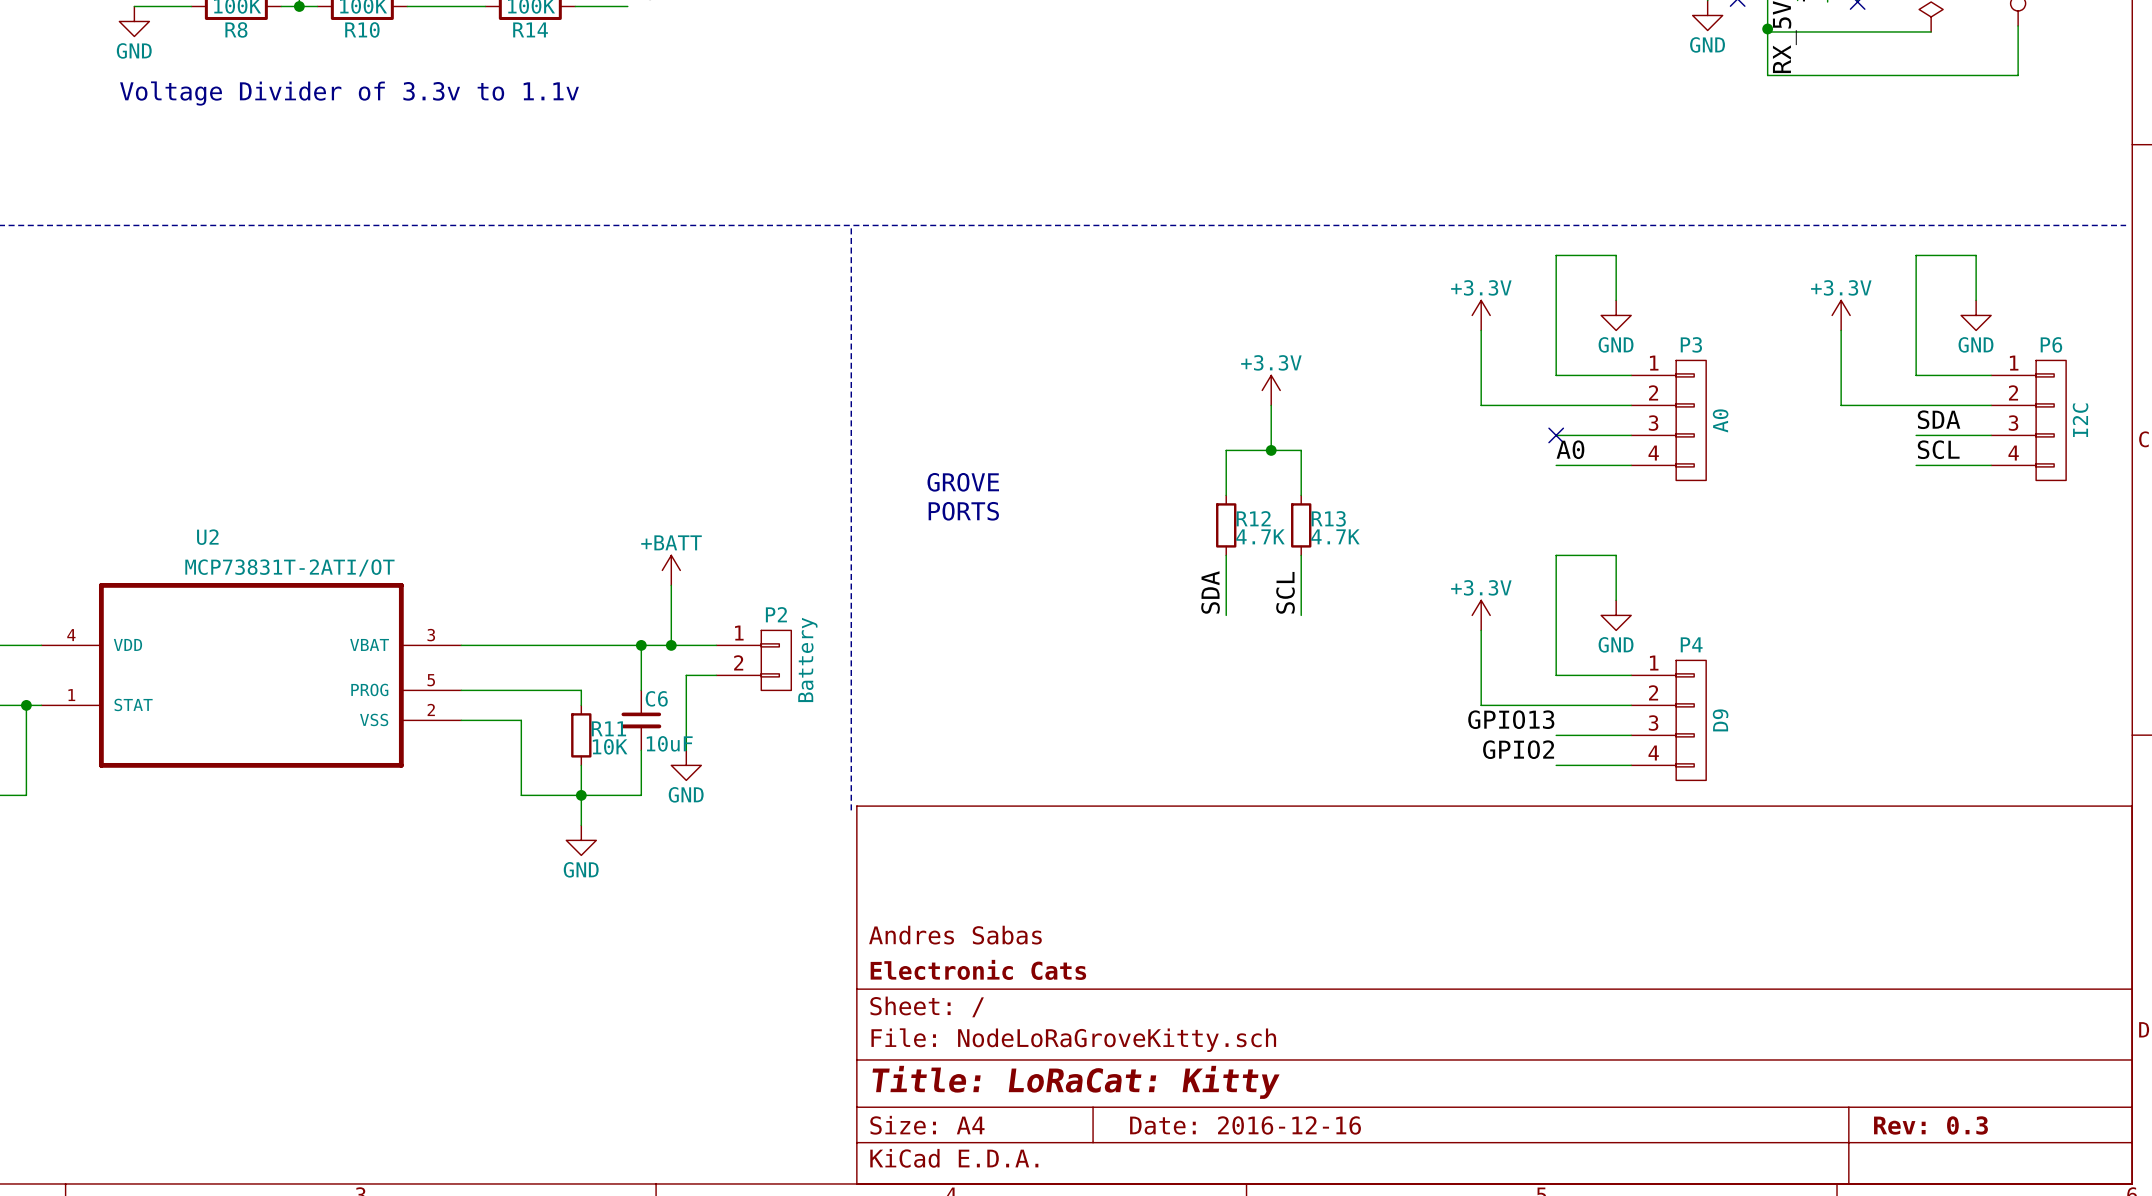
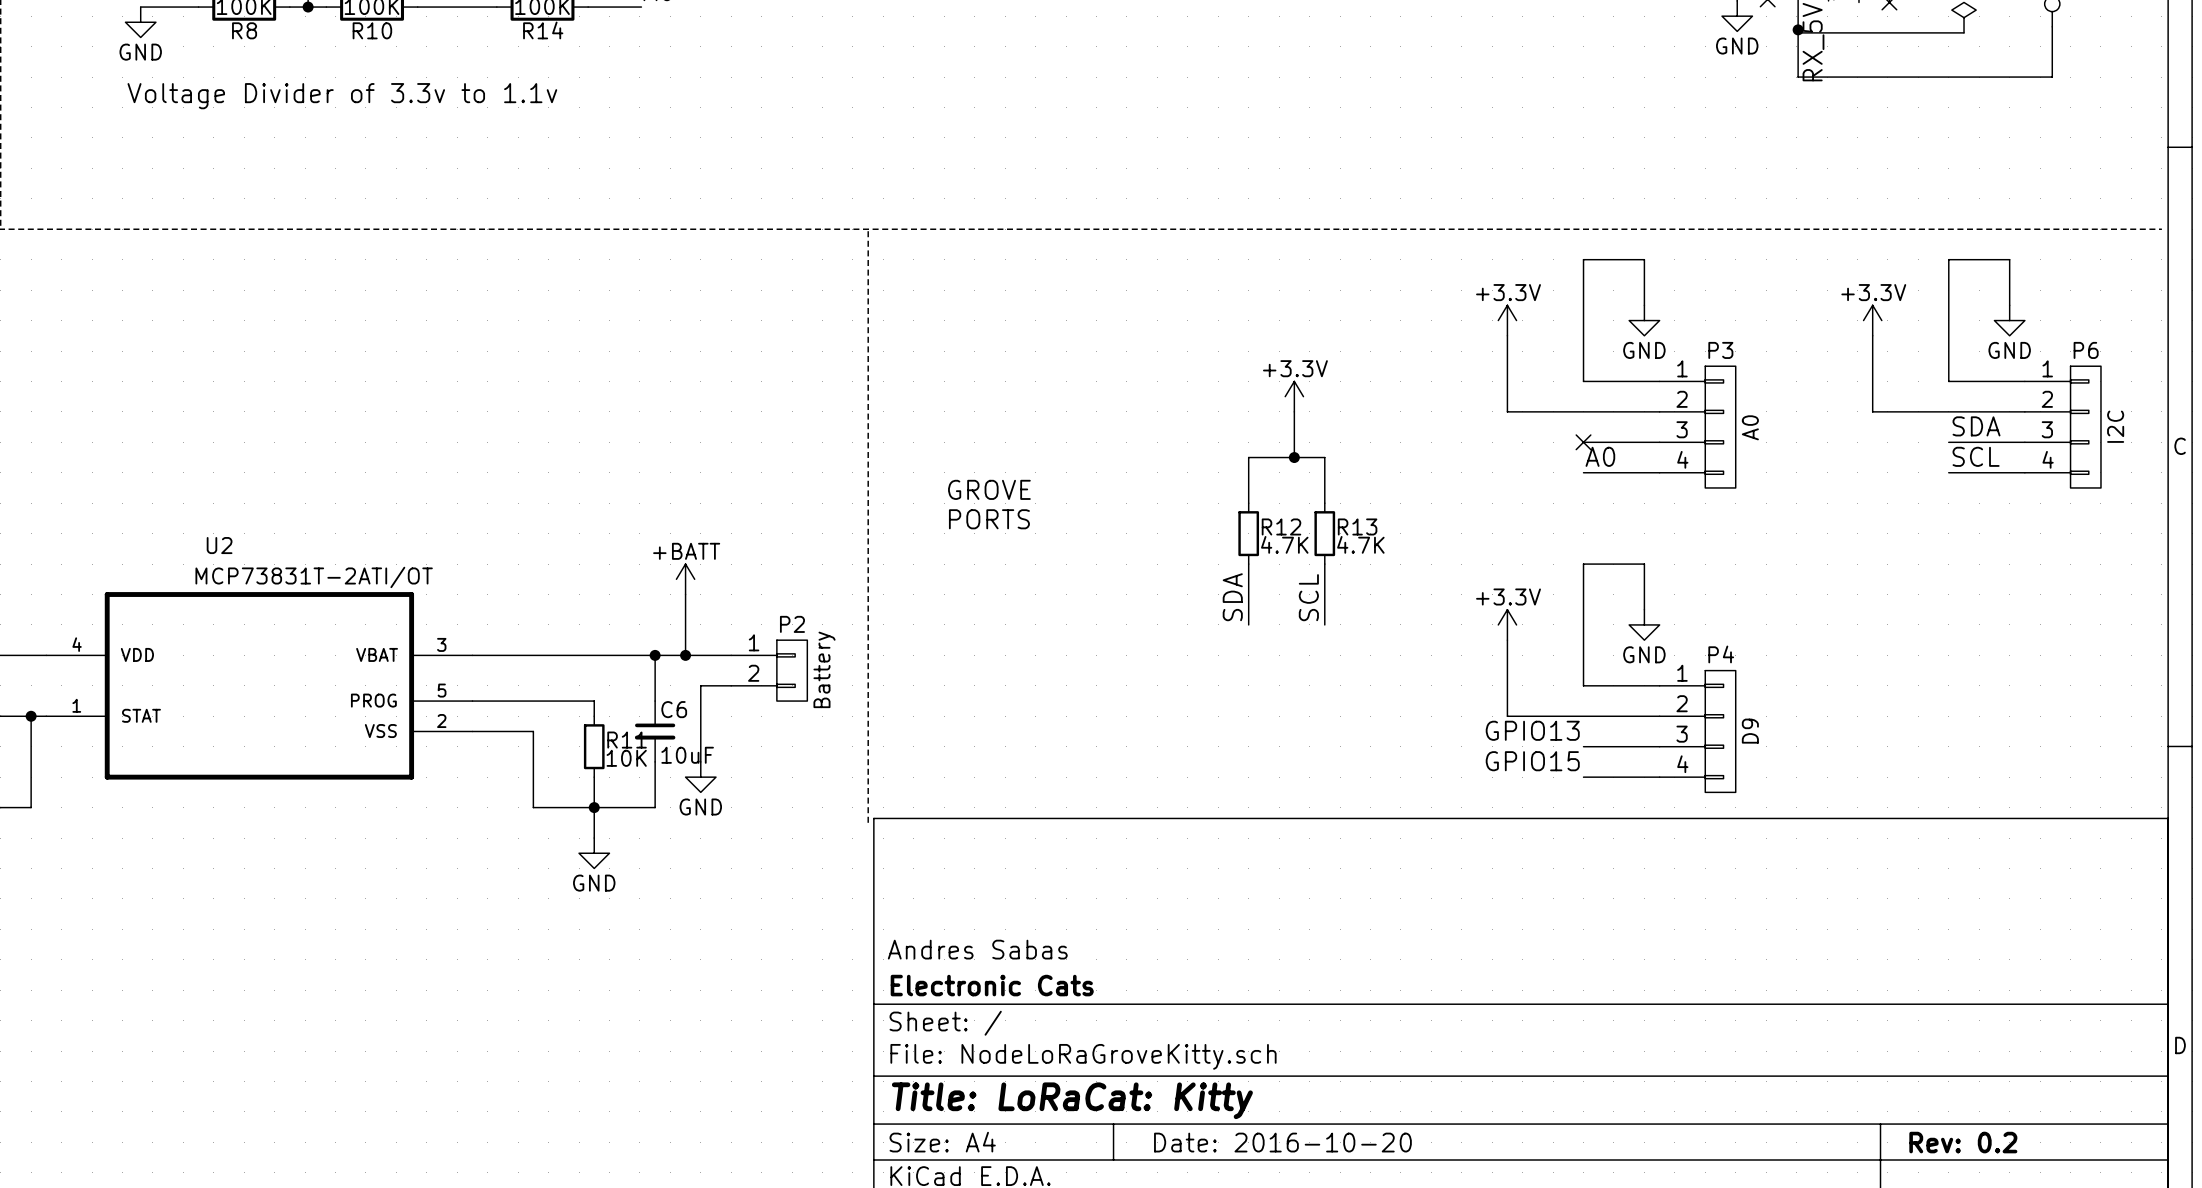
label: GPIO2 (1518, 749) -> GPIO15 (1532, 761)
title block: Date: 2016-12-16 (1245, 1125) -> Date: 2016-10-20 (1282, 1142)
title block: Rev: 0.3 (1930, 1125) -> Rev: 0.2 (1963, 1142)

